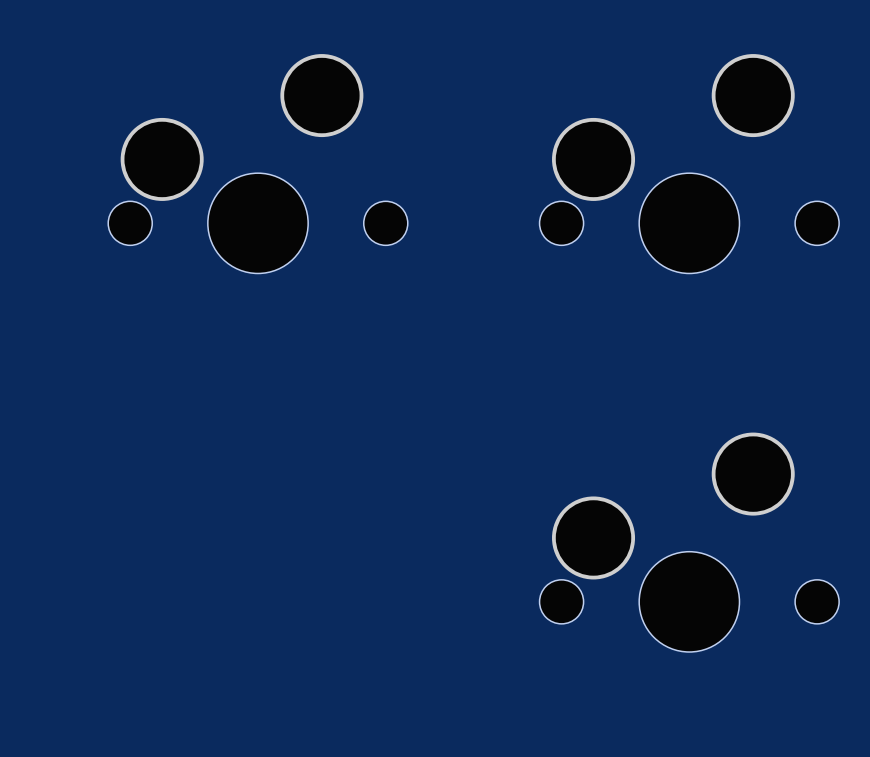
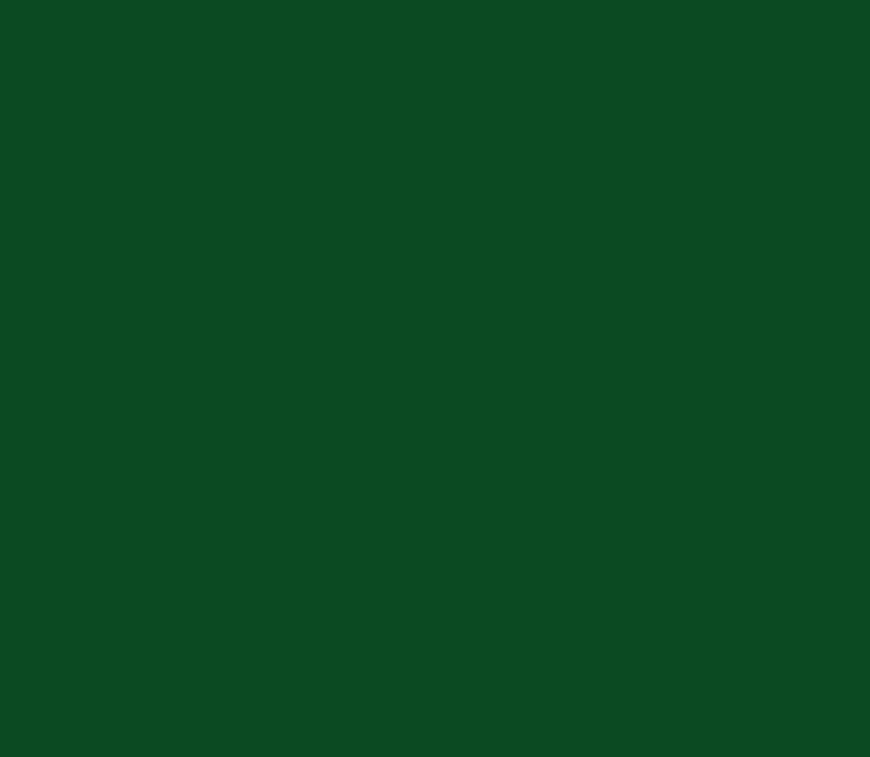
part: (257, 163) -> none
part: (689, 163) -> none
part: (689, 542) -> none

